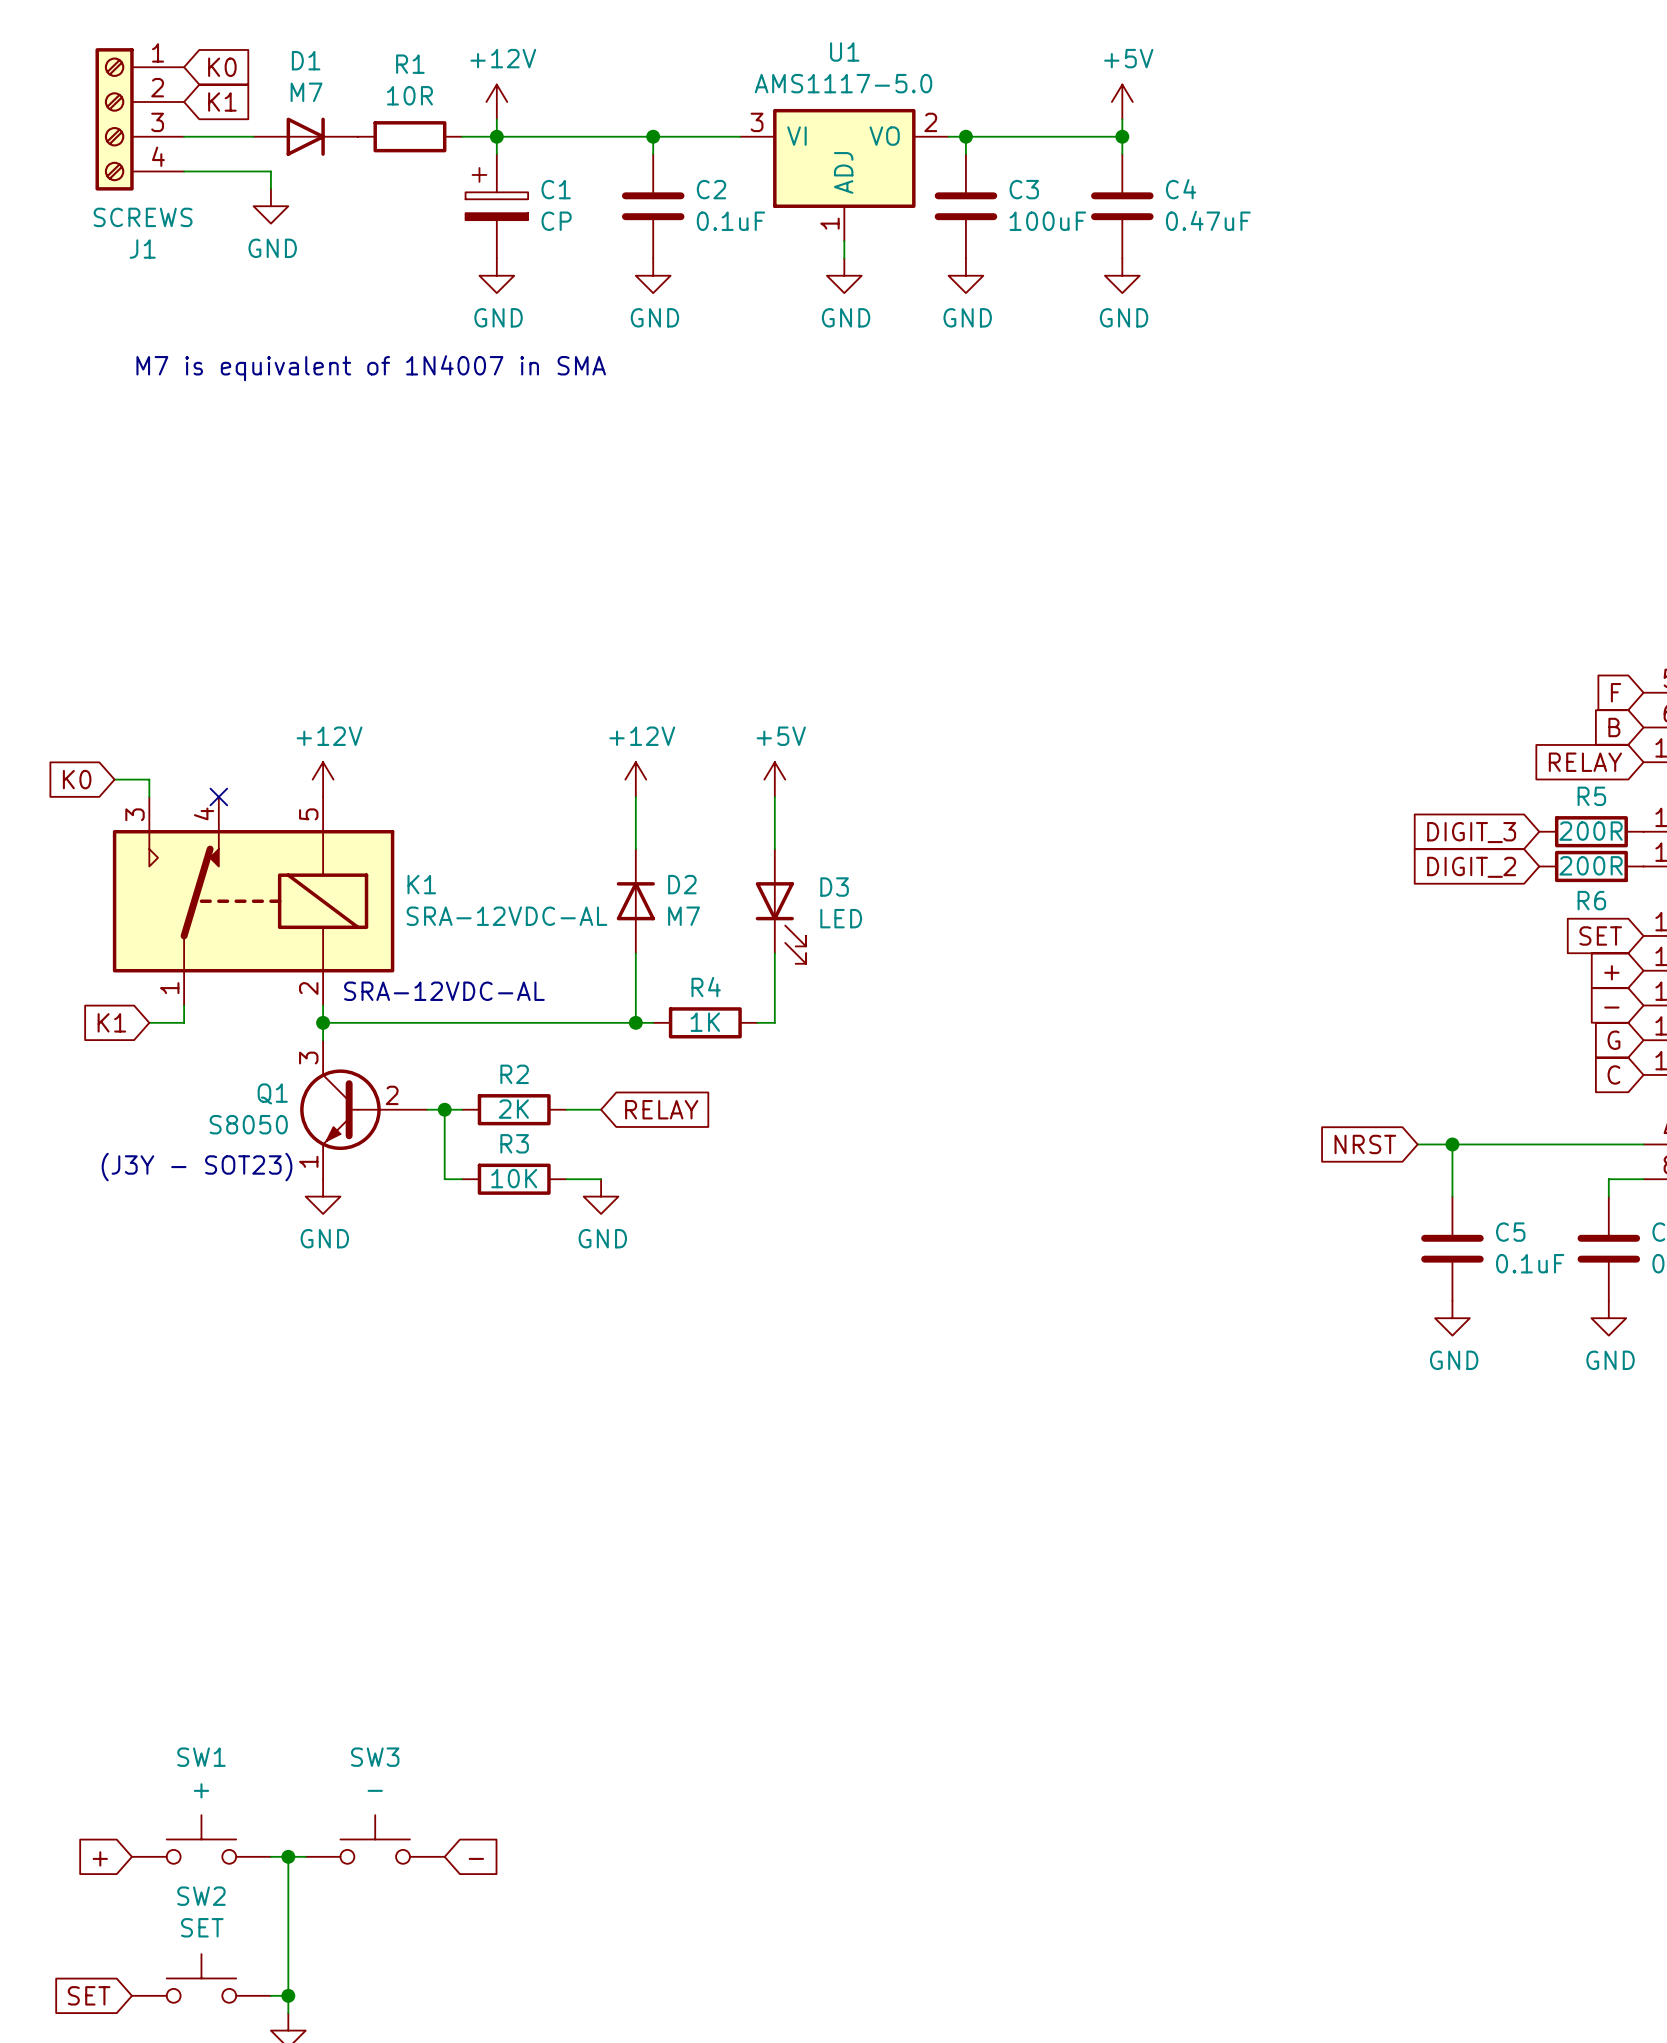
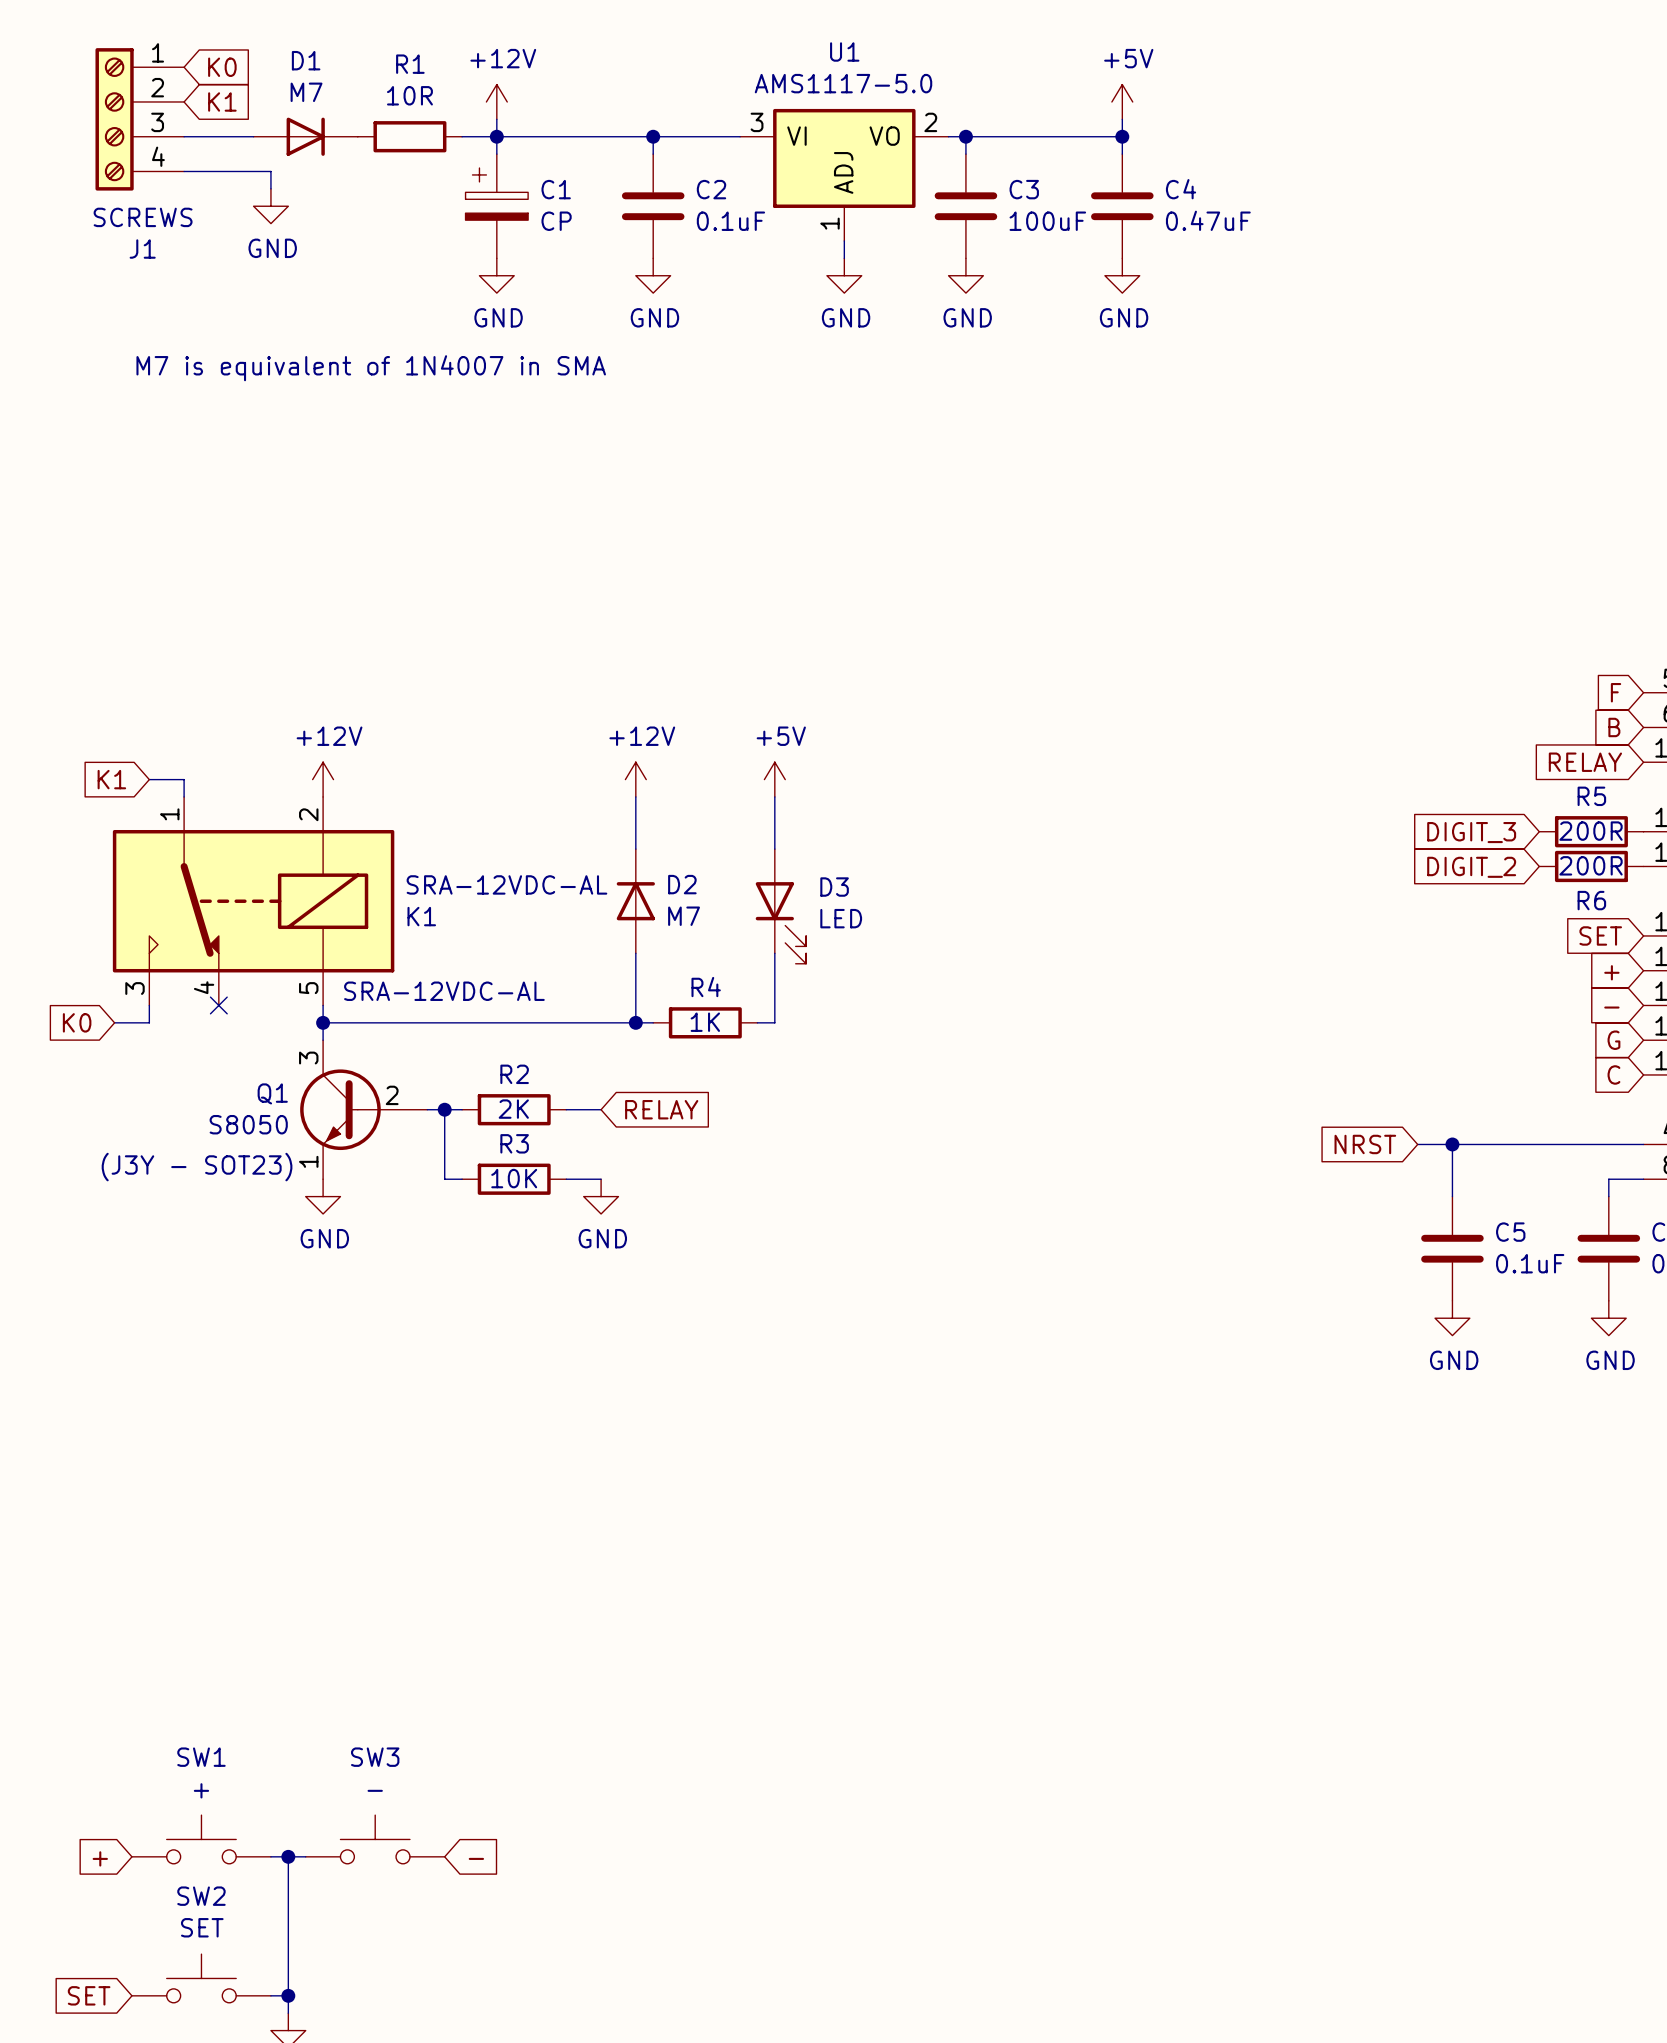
global label position: K0 (77, 779) -> K0 (77, 1022)
wire: (114, 779) (149, 779) (149, 796) -> (149, 779) (184, 779) (184, 796)
no-connect mark: (218, 796) -> none
K1 flip: as is (253, 901) -> up-down (253, 901)
wire: (184, 1005) (184, 1022) (149, 1022) -> (149, 1005) (149, 1022) (114, 1022)
no-connect mark: none -> (218, 1005)
global label position: K1 (111, 1022) -> K1 (111, 779)

